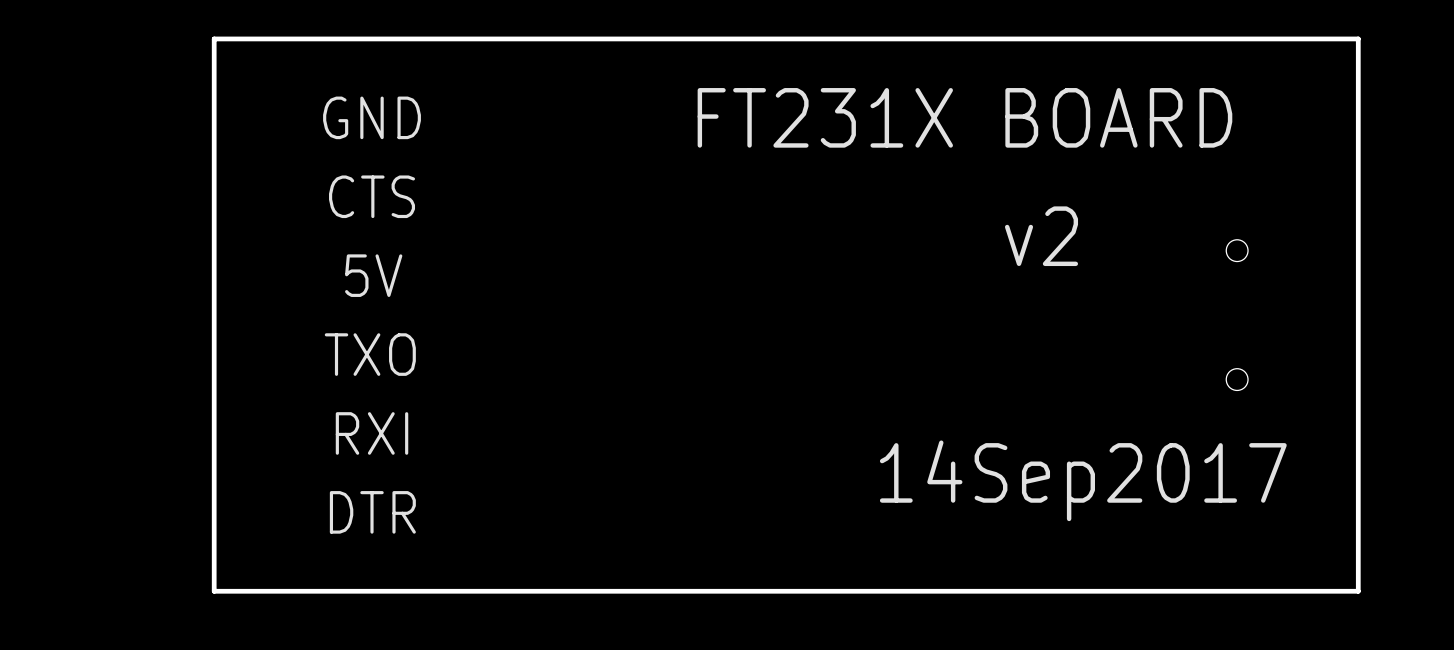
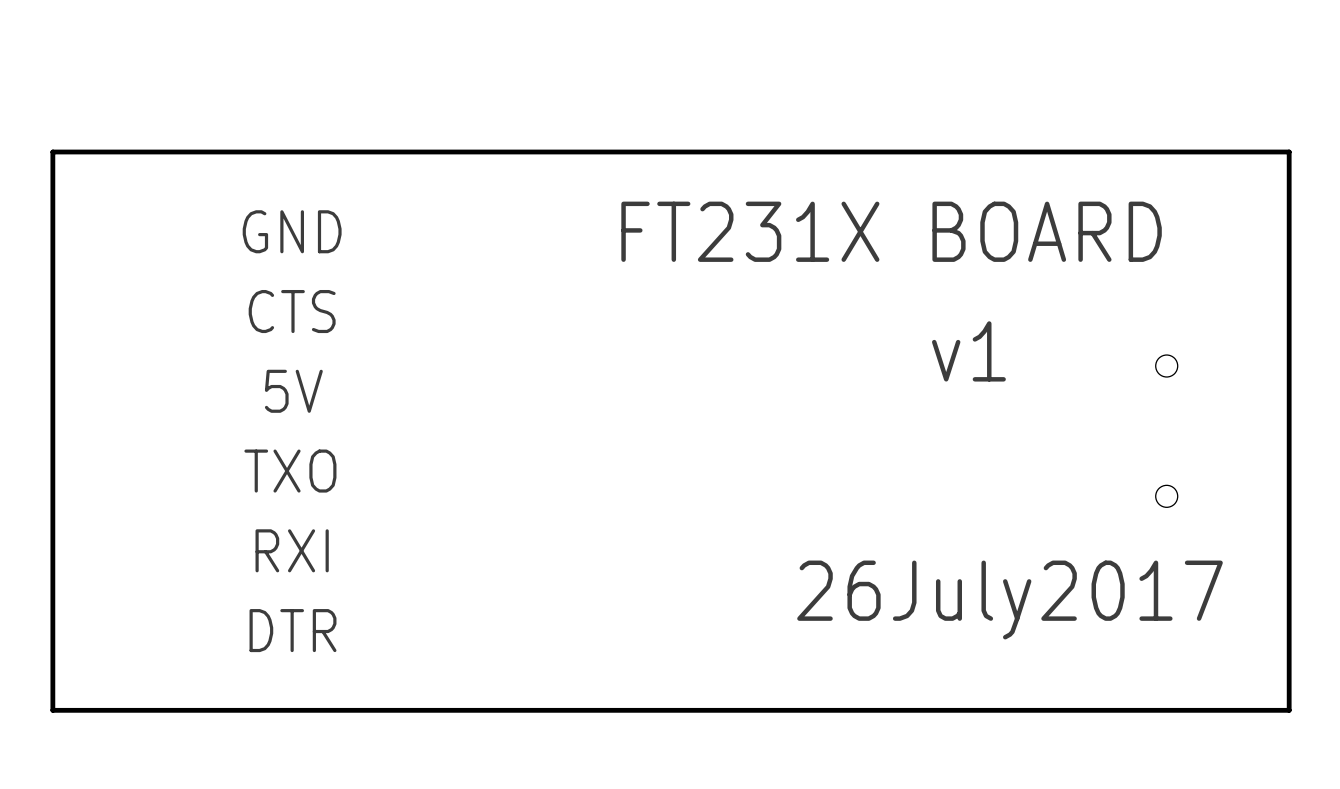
board edge: (214, 38) (214, 591) -> (132, 152) (52, 152) (52, 710) (132, 710)
text: v2 (1041, 236) -> v1 (968, 351)
text: 14Sep2017 (1083, 480) -> 26July2017 (1010, 600)

